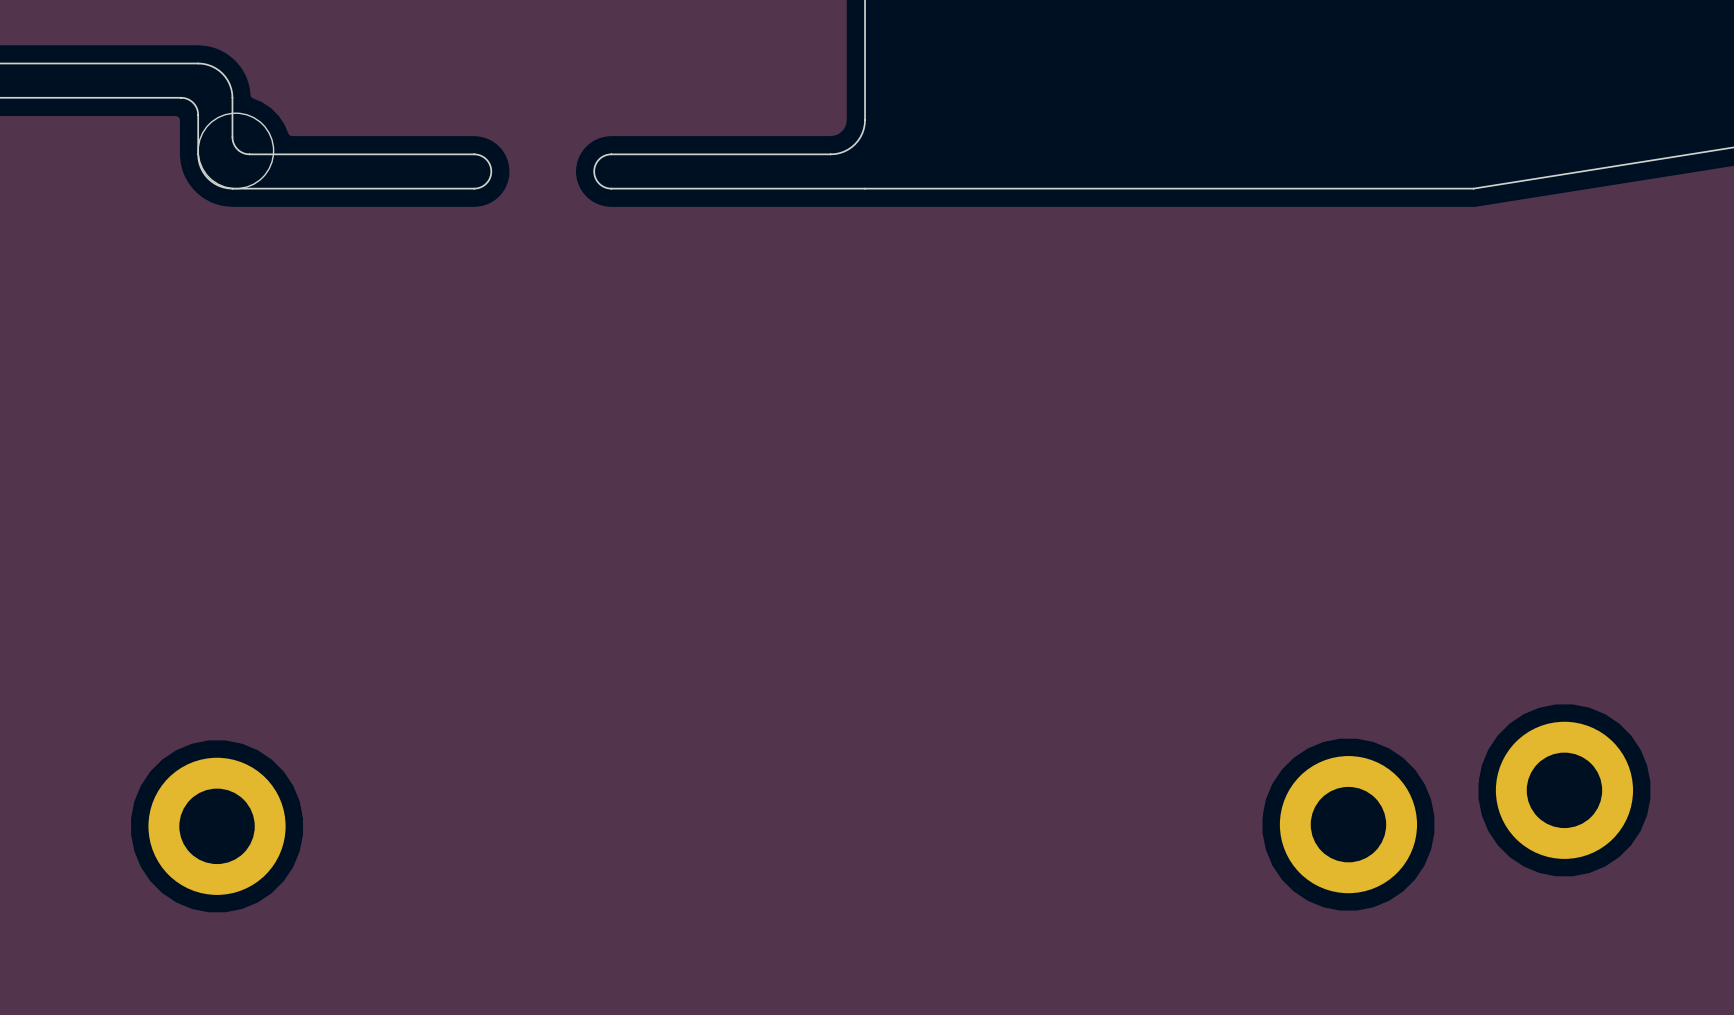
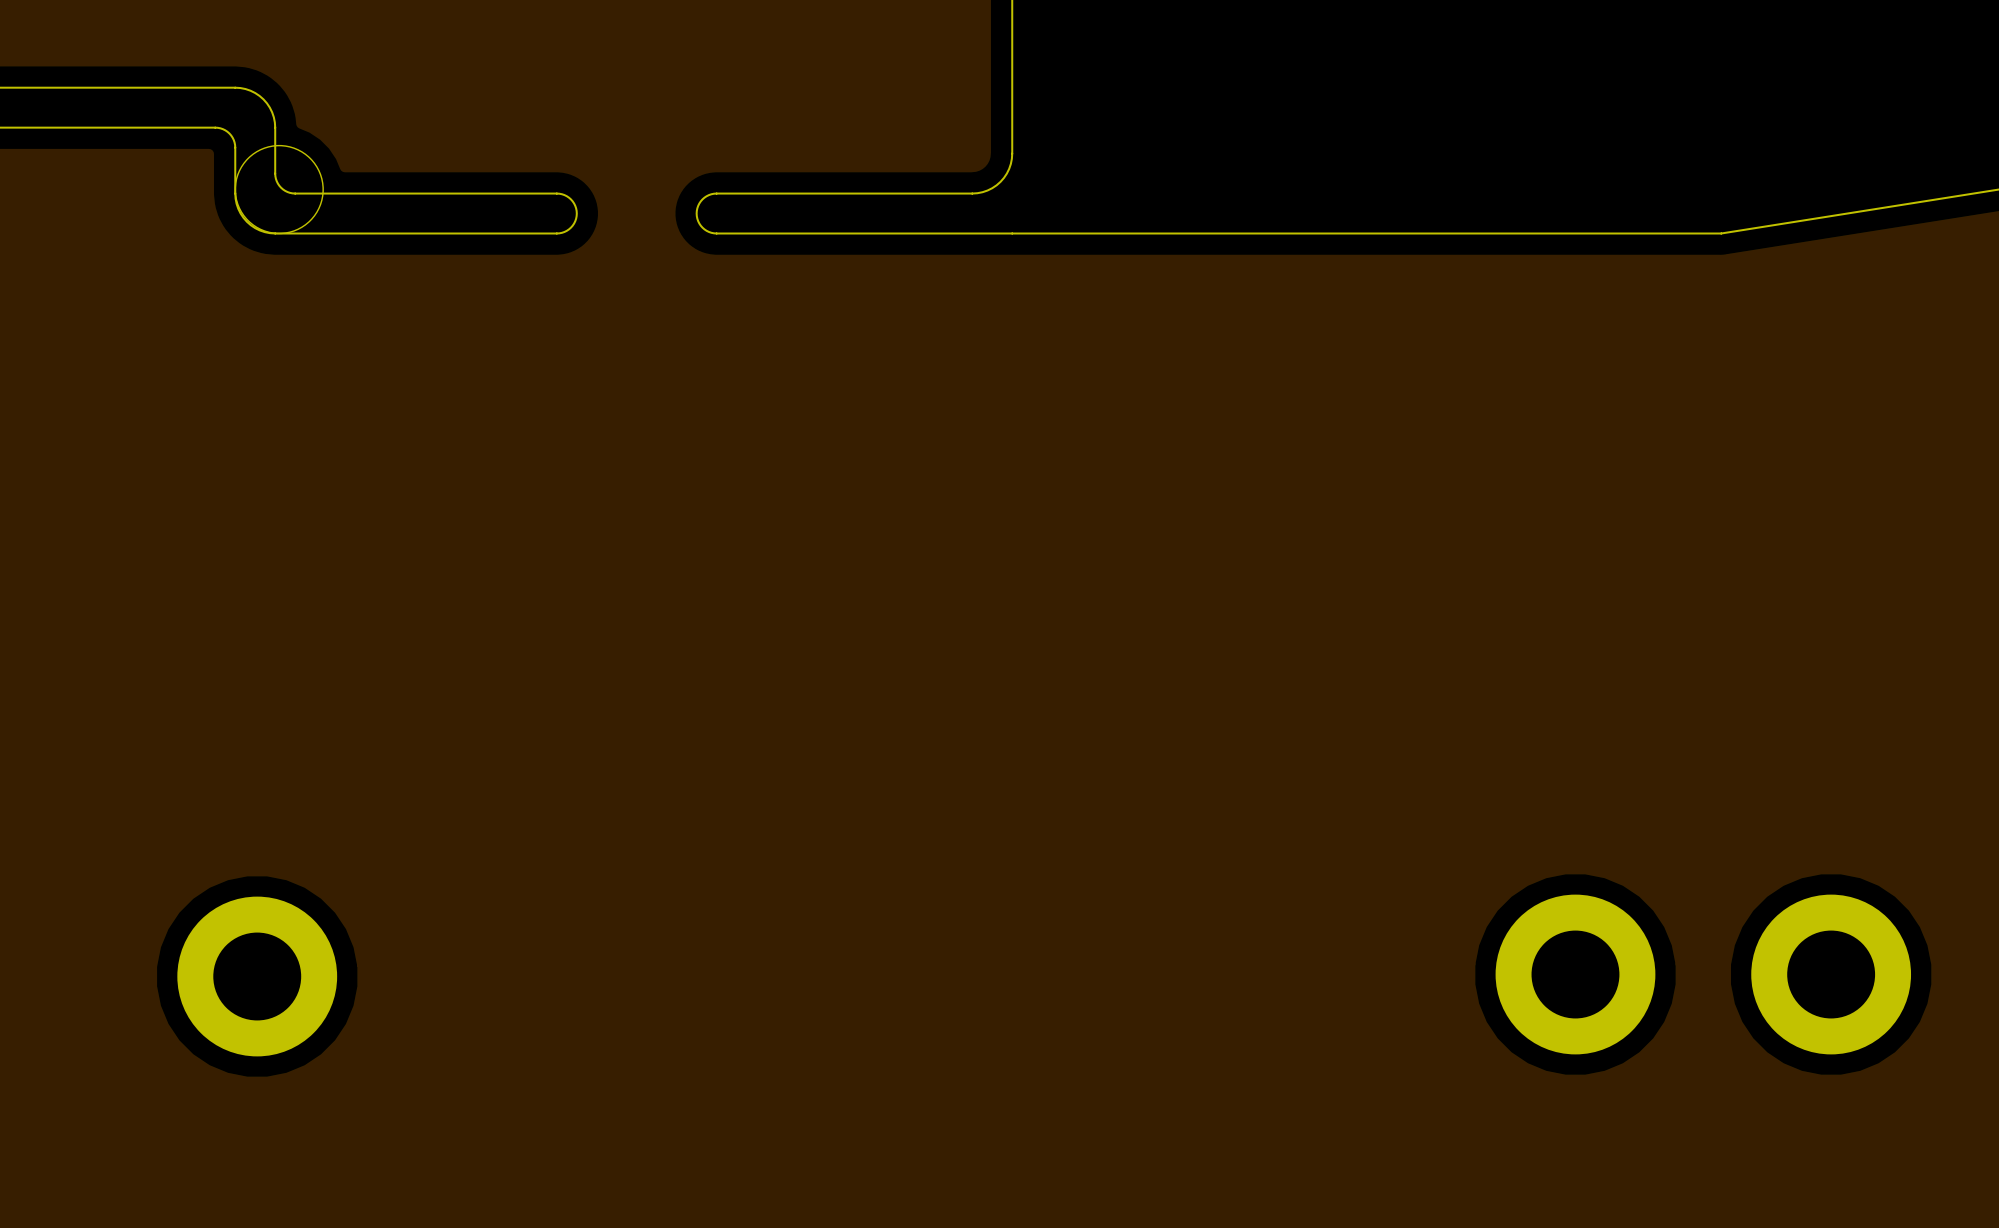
part position: (1564, 790) -> (1831, 974)

